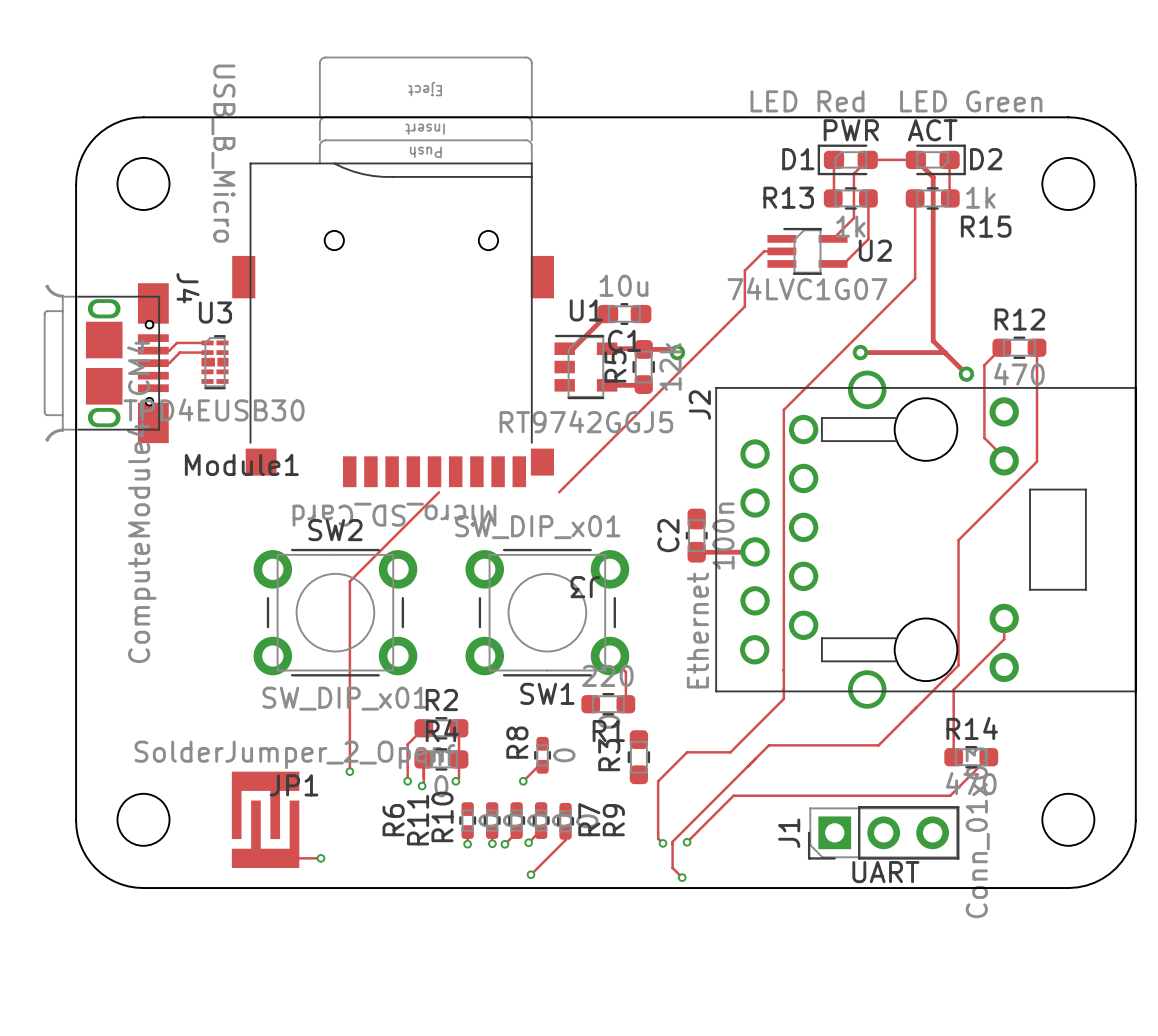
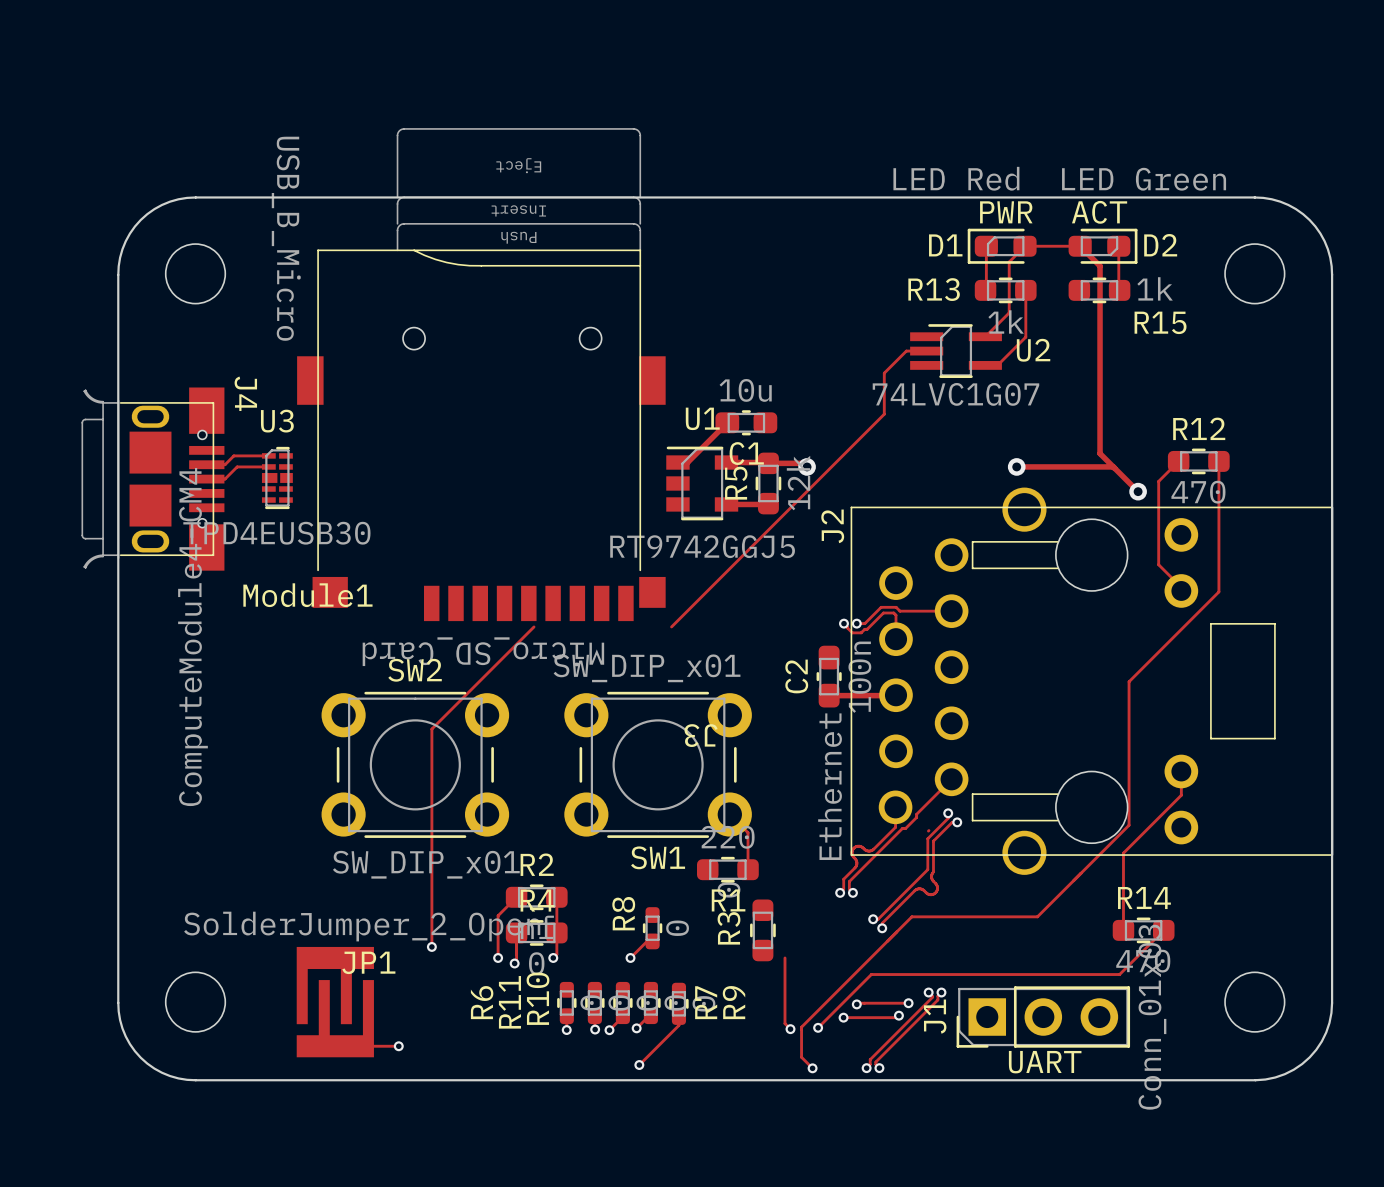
track: (915, 198) (915, 278) (783, 409) (783, 698) (730, 752) (687, 752) (658, 781) -> none
track: none -> (951, 611) (900, 611) (896, 607) (881, 607) (864, 623) (856, 623)
track: none -> (843, 623) (852, 632) (861, 632) (883, 613) (893, 613) (896, 615) (896, 639)
via: none -> (843, 623)
via: none -> (856, 623)
track: none -> (951, 779) (916, 814) (916, 817) (905, 828) (902, 828) (849, 881) (849, 889) (852, 892)
track: none -> (895, 807) (895, 827) (873, 849) (868, 851) (857, 846) (853, 849) (852, 853) (856, 861) (856, 865) (843, 879) (843, 889) (840, 892)
track: none -> (948, 813) (948, 818) (927, 838) (927, 869) (878, 919) (873, 919)
via: none -> (948, 813)
track: none -> (957, 822) (952, 822) (933, 841) (933, 871) (931, 877) (937, 885) (936, 891) (930, 894) (921, 889) (915, 889) (882, 923) (882, 928)
via: none -> (957, 822)
via: none -> (840, 892)
via: none -> (852, 892)
via: none -> (873, 919)
via: none -> (882, 928)
track: none -> (928, 992) (932, 997) (870, 1059) (870, 1064) (866, 1068)
via: none -> (928, 992)
track: none -> (941, 992) (937, 996) (937, 999) (875, 1062) (879, 1068)
via: none -> (941, 992)
track: none -> (908, 1003) (856, 1004)
via: none -> (908, 1003)
via: none -> (856, 1004)
track: none -> (898, 1015) (898, 1017) (843, 1017)
via: none -> (898, 1015)
via: none -> (843, 1017)
via: none -> (866, 1068)
via: none -> (879, 1068)

